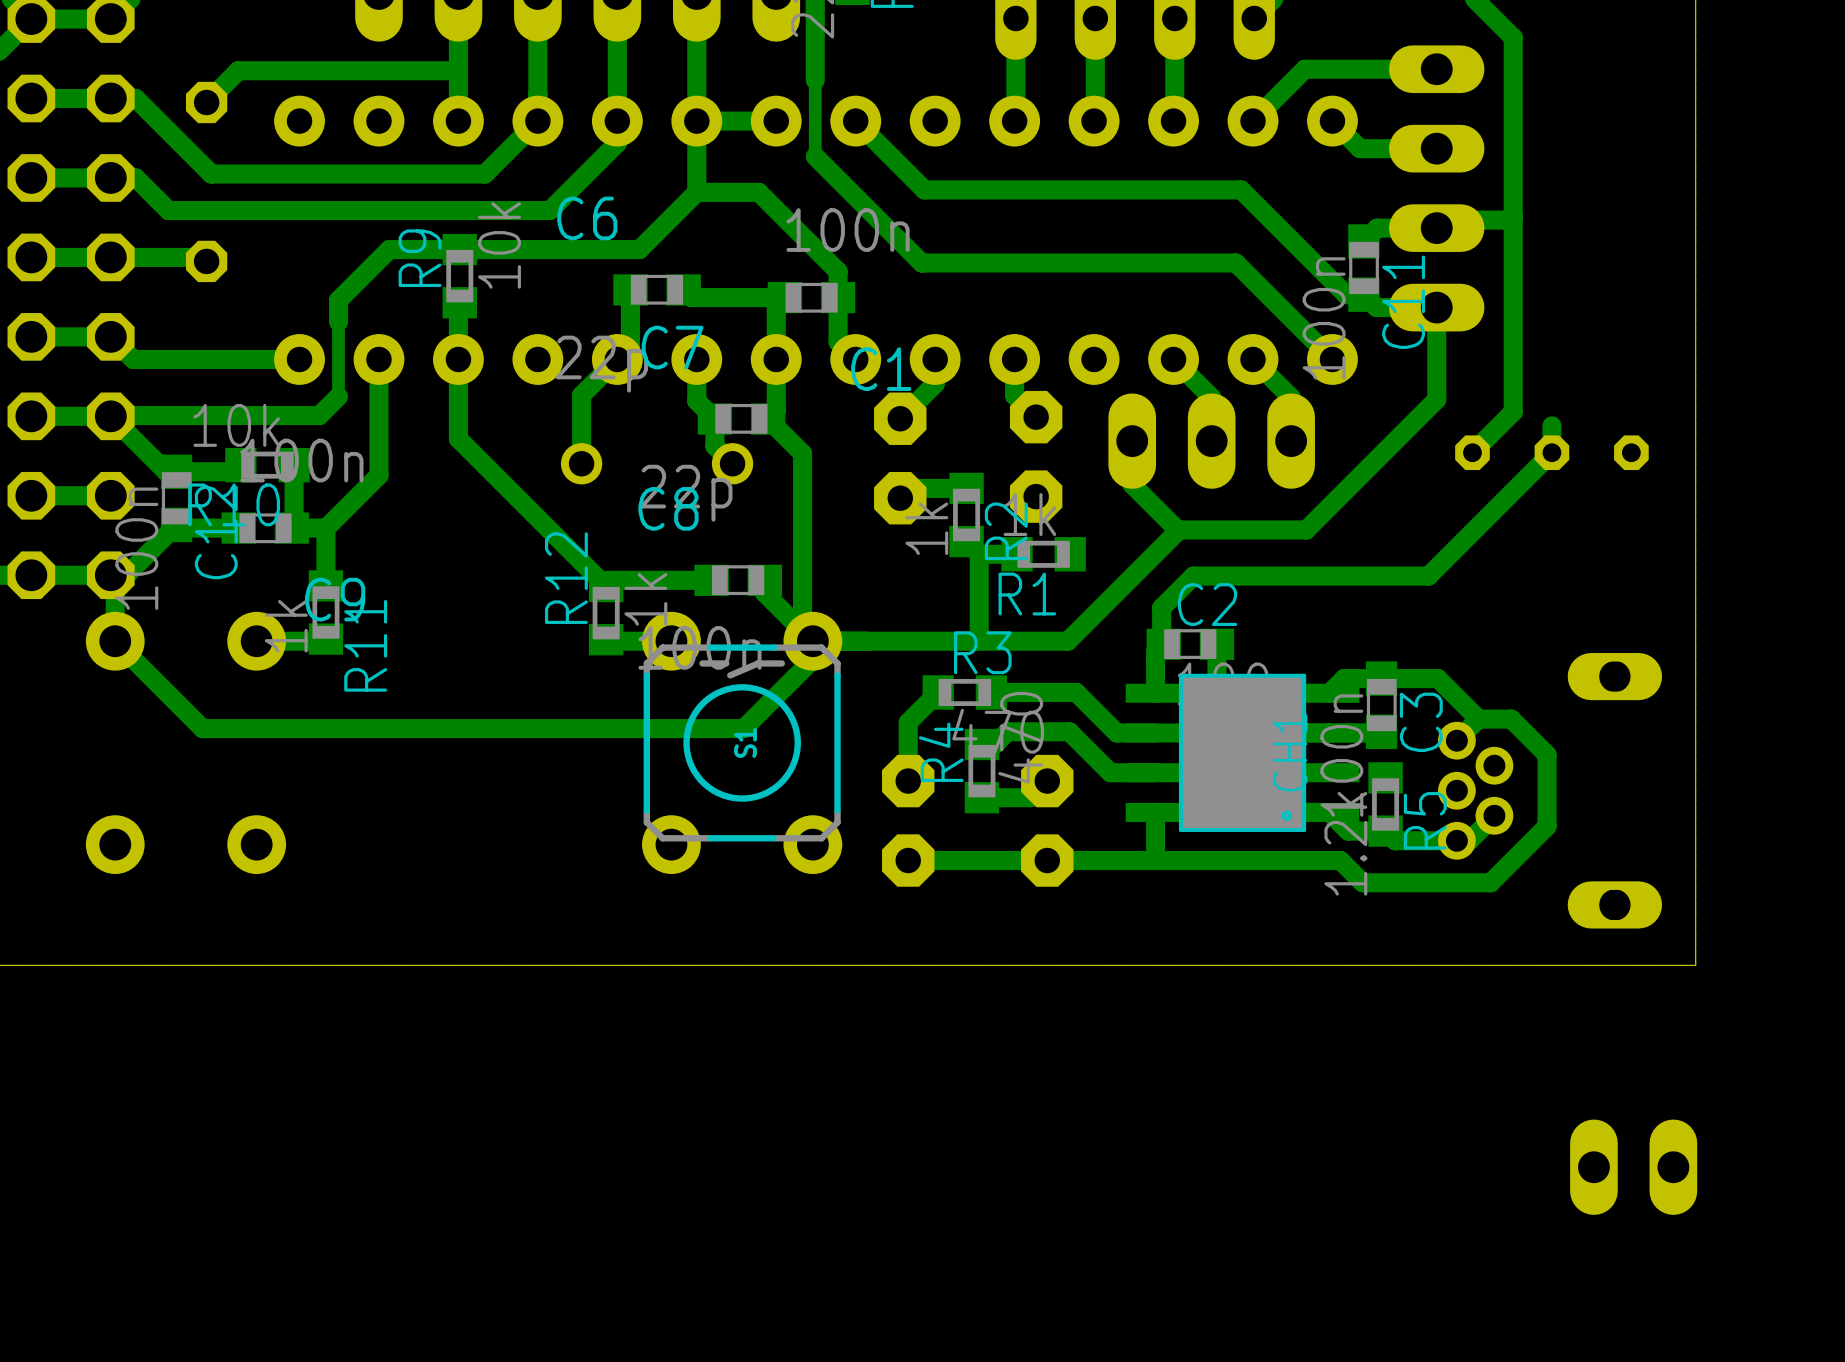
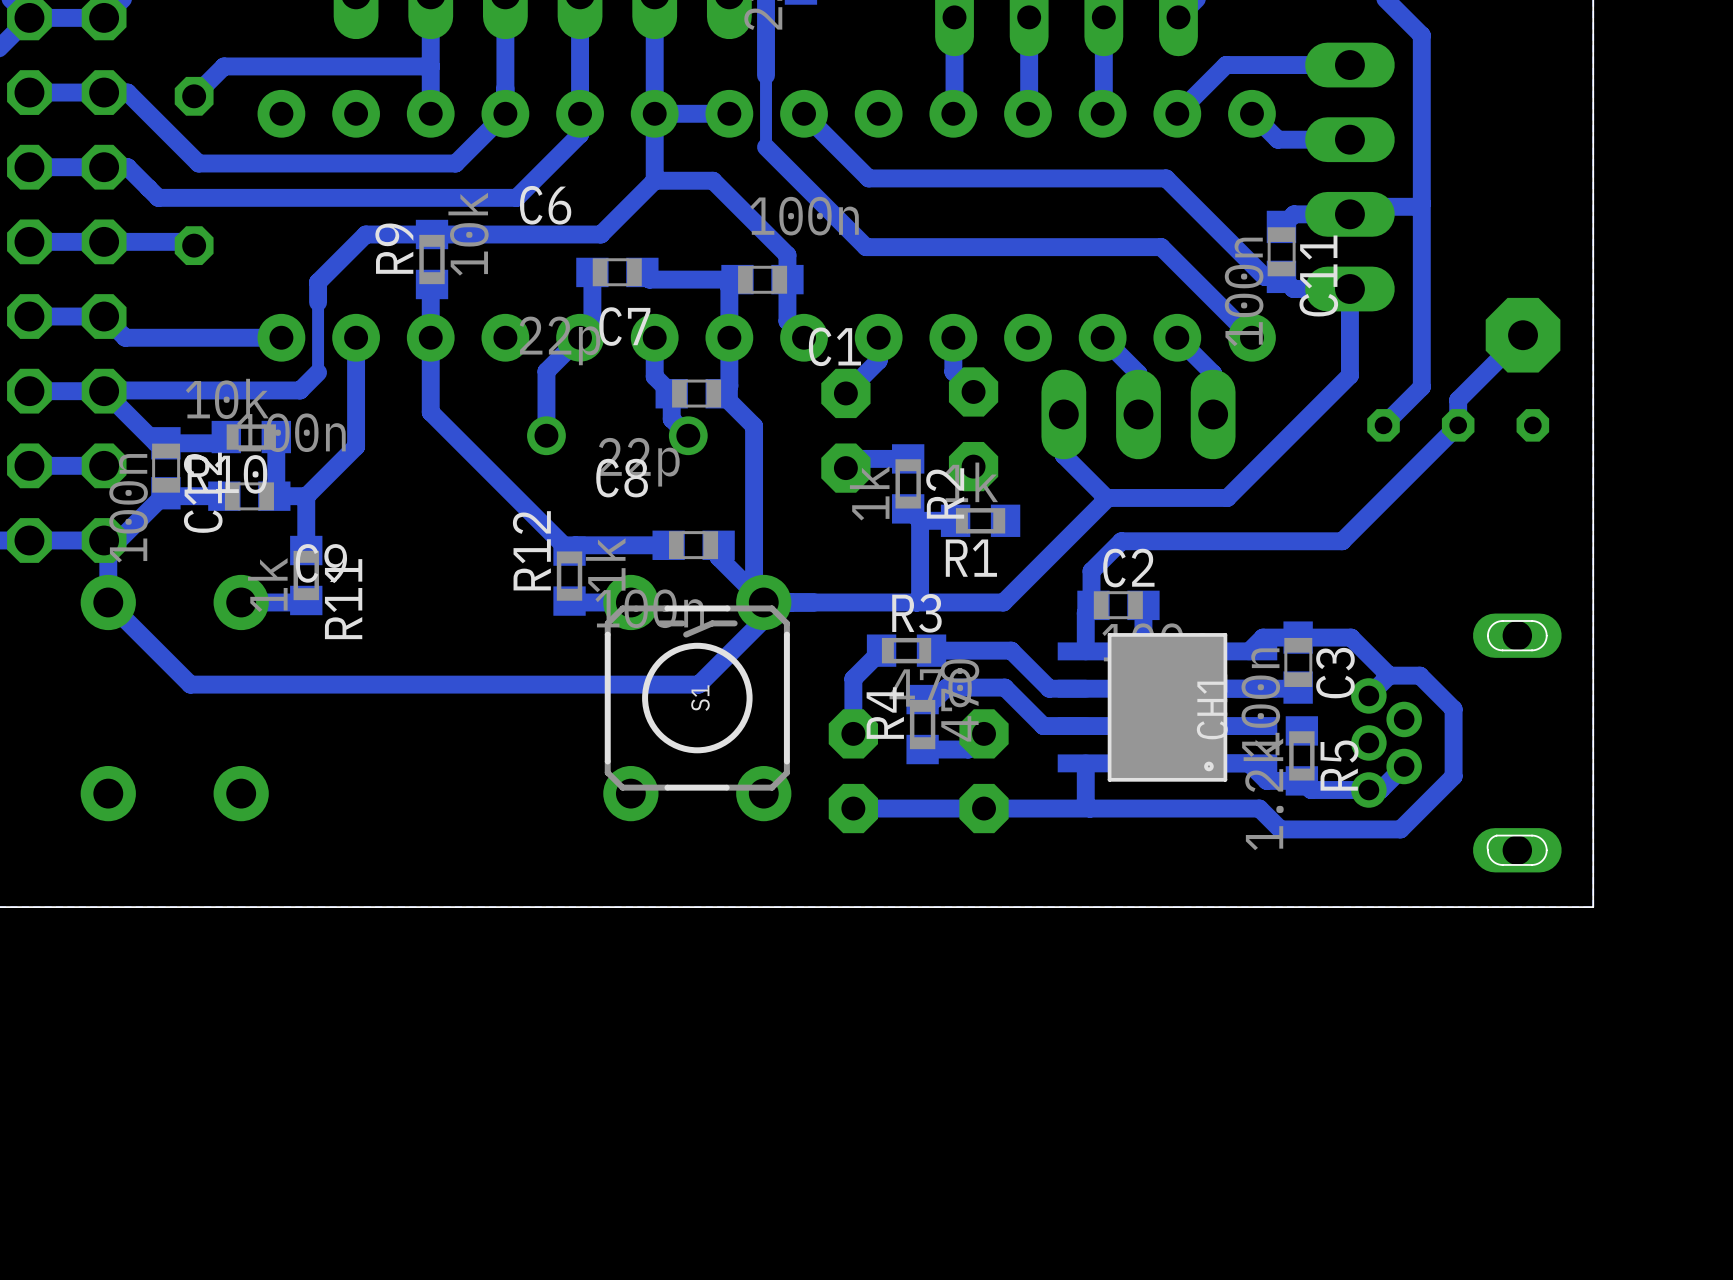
bottom track: none -> (1523, 335) (1458, 400)
part: none -> (1523, 335)
part: (1633, 1167) -> none

